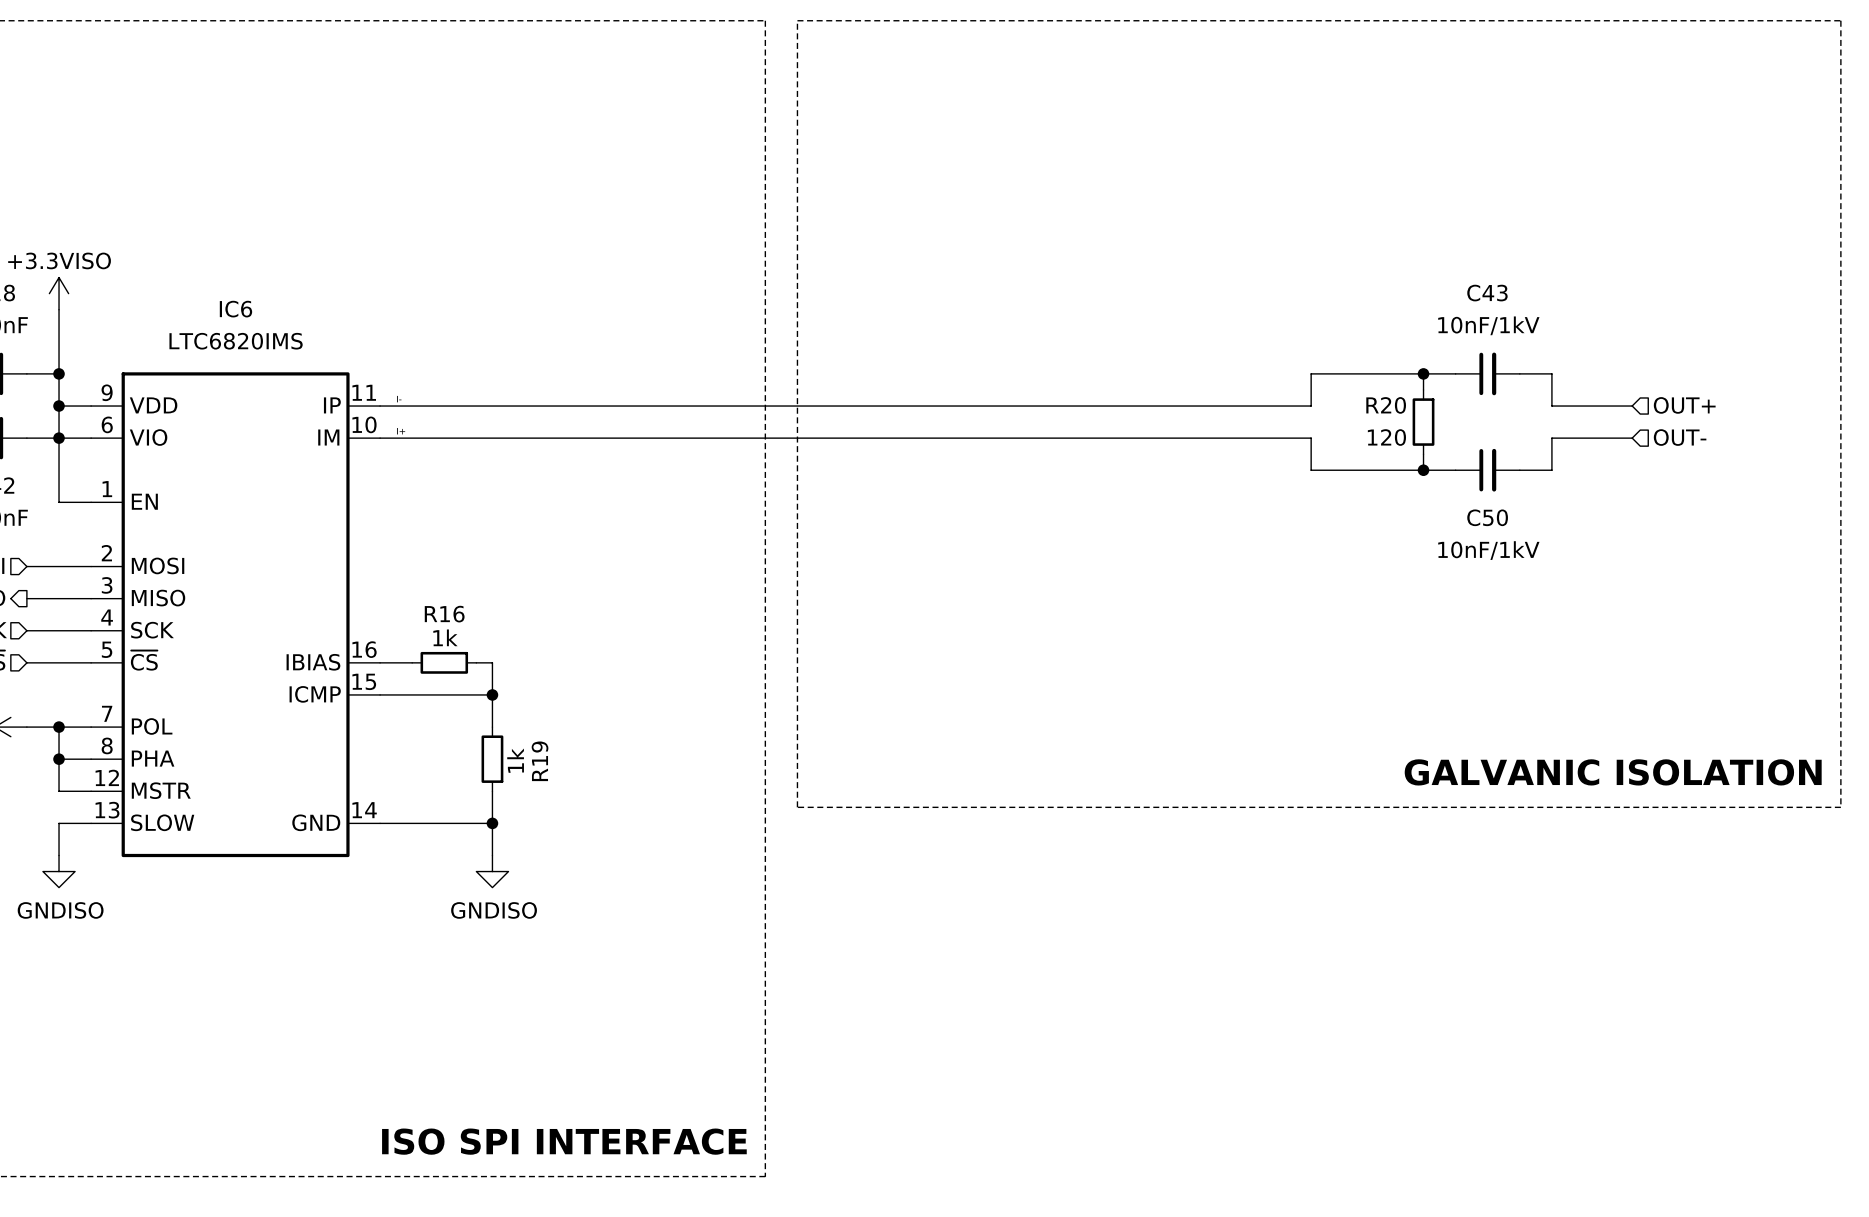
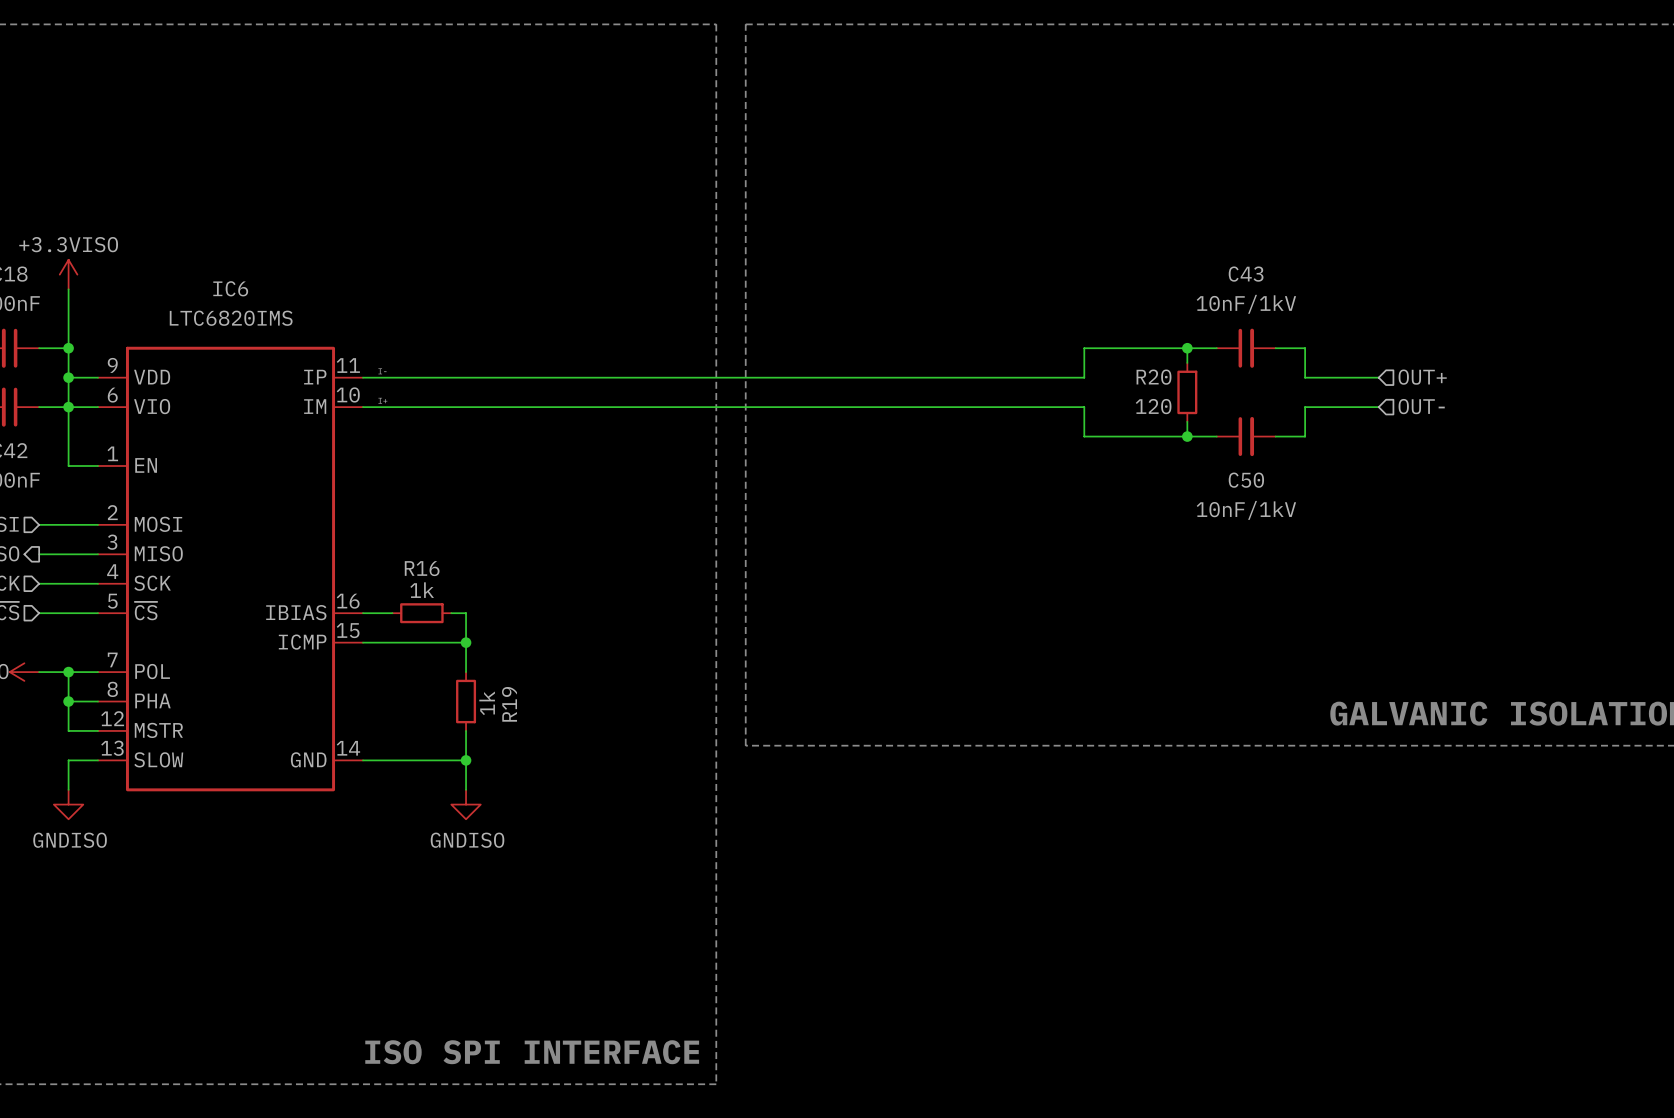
junction: none -> (1187, 348)
wire: (1375, 373) (1311, 373) (1311, 406) (1166, 406) -> (1216, 348) (1084, 348) (1084, 377)
wire: (1407, 373) (1455, 373) -> (1305, 348) (1305, 377) (1378, 377)
wire: (1423, 373) (1423, 389) -> (1187, 348) (1187, 362)
junction: (1423, 373) -> none
C43 position: (1487, 373) -> (1246, 348)
wire: (1519, 373) (1551, 373) (1551, 406) (1632, 406) -> none
hierarchical label position: OUT+ (1684, 405) -> OUT+ (1422, 377)
R20 position: (1423, 422) -> (1187, 392)
hierarchical label position: OUT- (1680, 437) -> OUT- (1421, 406)
wire: (1166, 438) (1311, 438) (1311, 470) (1375, 470) -> (1084, 407) (1084, 436) (1216, 436)
wire: (1632, 438) (1551, 438) (1551, 470) (1519, 470) -> none
wire: (1423, 454) (1423, 470) -> (1187, 421) (1187, 436)
junction: none -> (1187, 436)
wire: (1407, 470) (1455, 470) -> (1305, 436) (1305, 407) (1378, 407)
junction: (1423, 470) -> none
C50 position: (1487, 470) -> (1246, 436)

